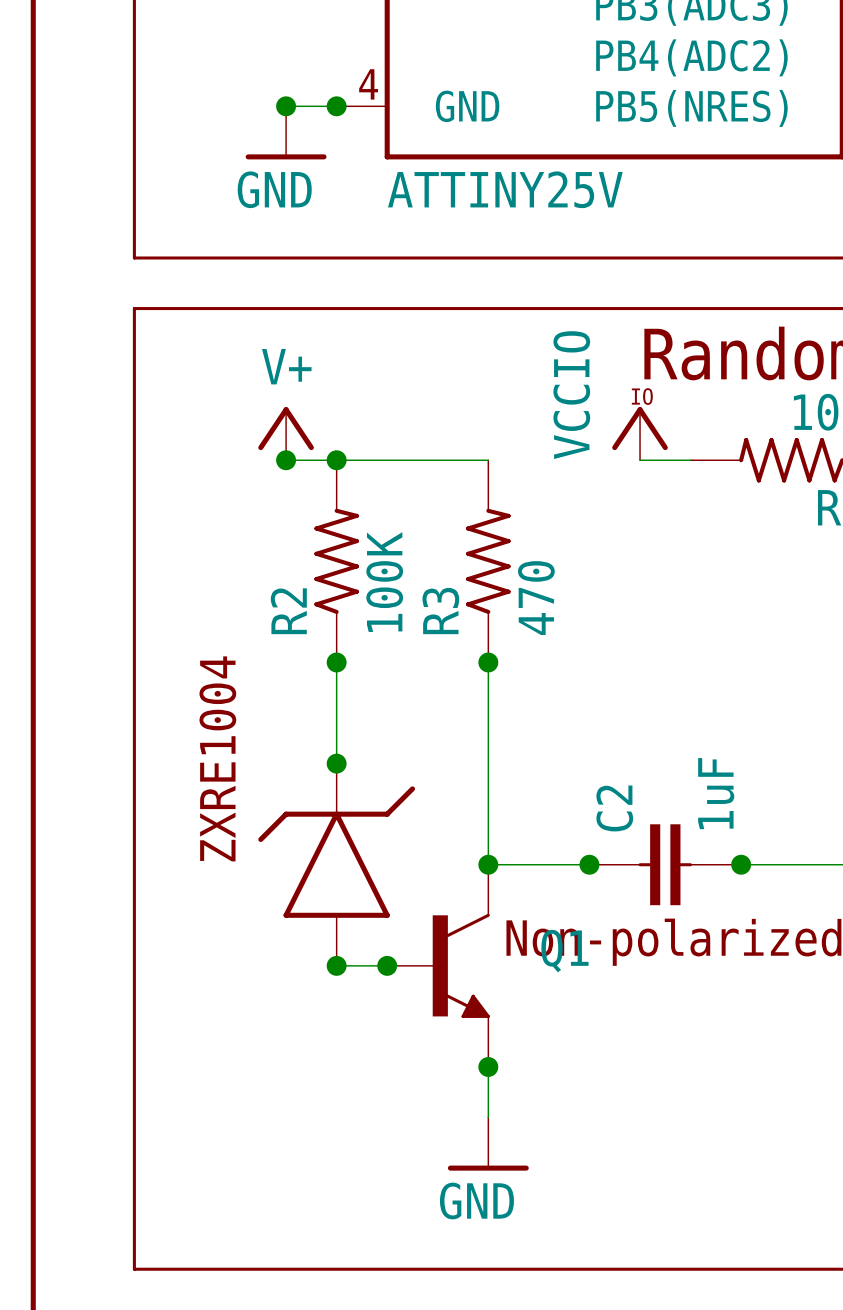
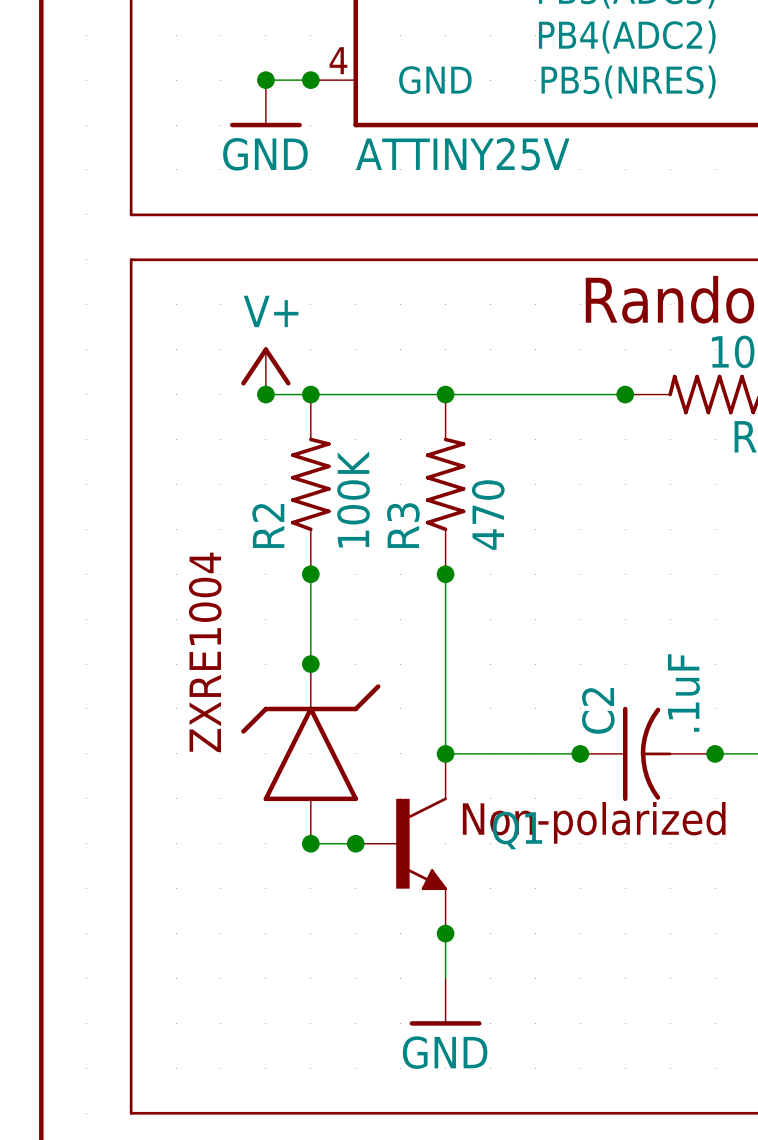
power symbol: VCCIO (640, 433) -> none
wire: none -> (445, 394) (580, 394)
junction: none -> (445, 394)
junction: none -> (625, 394)
C2 value: 1uF (716, 793) -> .1uF (683, 693)
C2 symbol: [589, 824, 742, 906] -> [580, 706, 716, 802]
junction: (589, 864) -> none
junction: none -> (580, 753)
junction: (741, 864) -> none
junction: none -> (715, 753)

